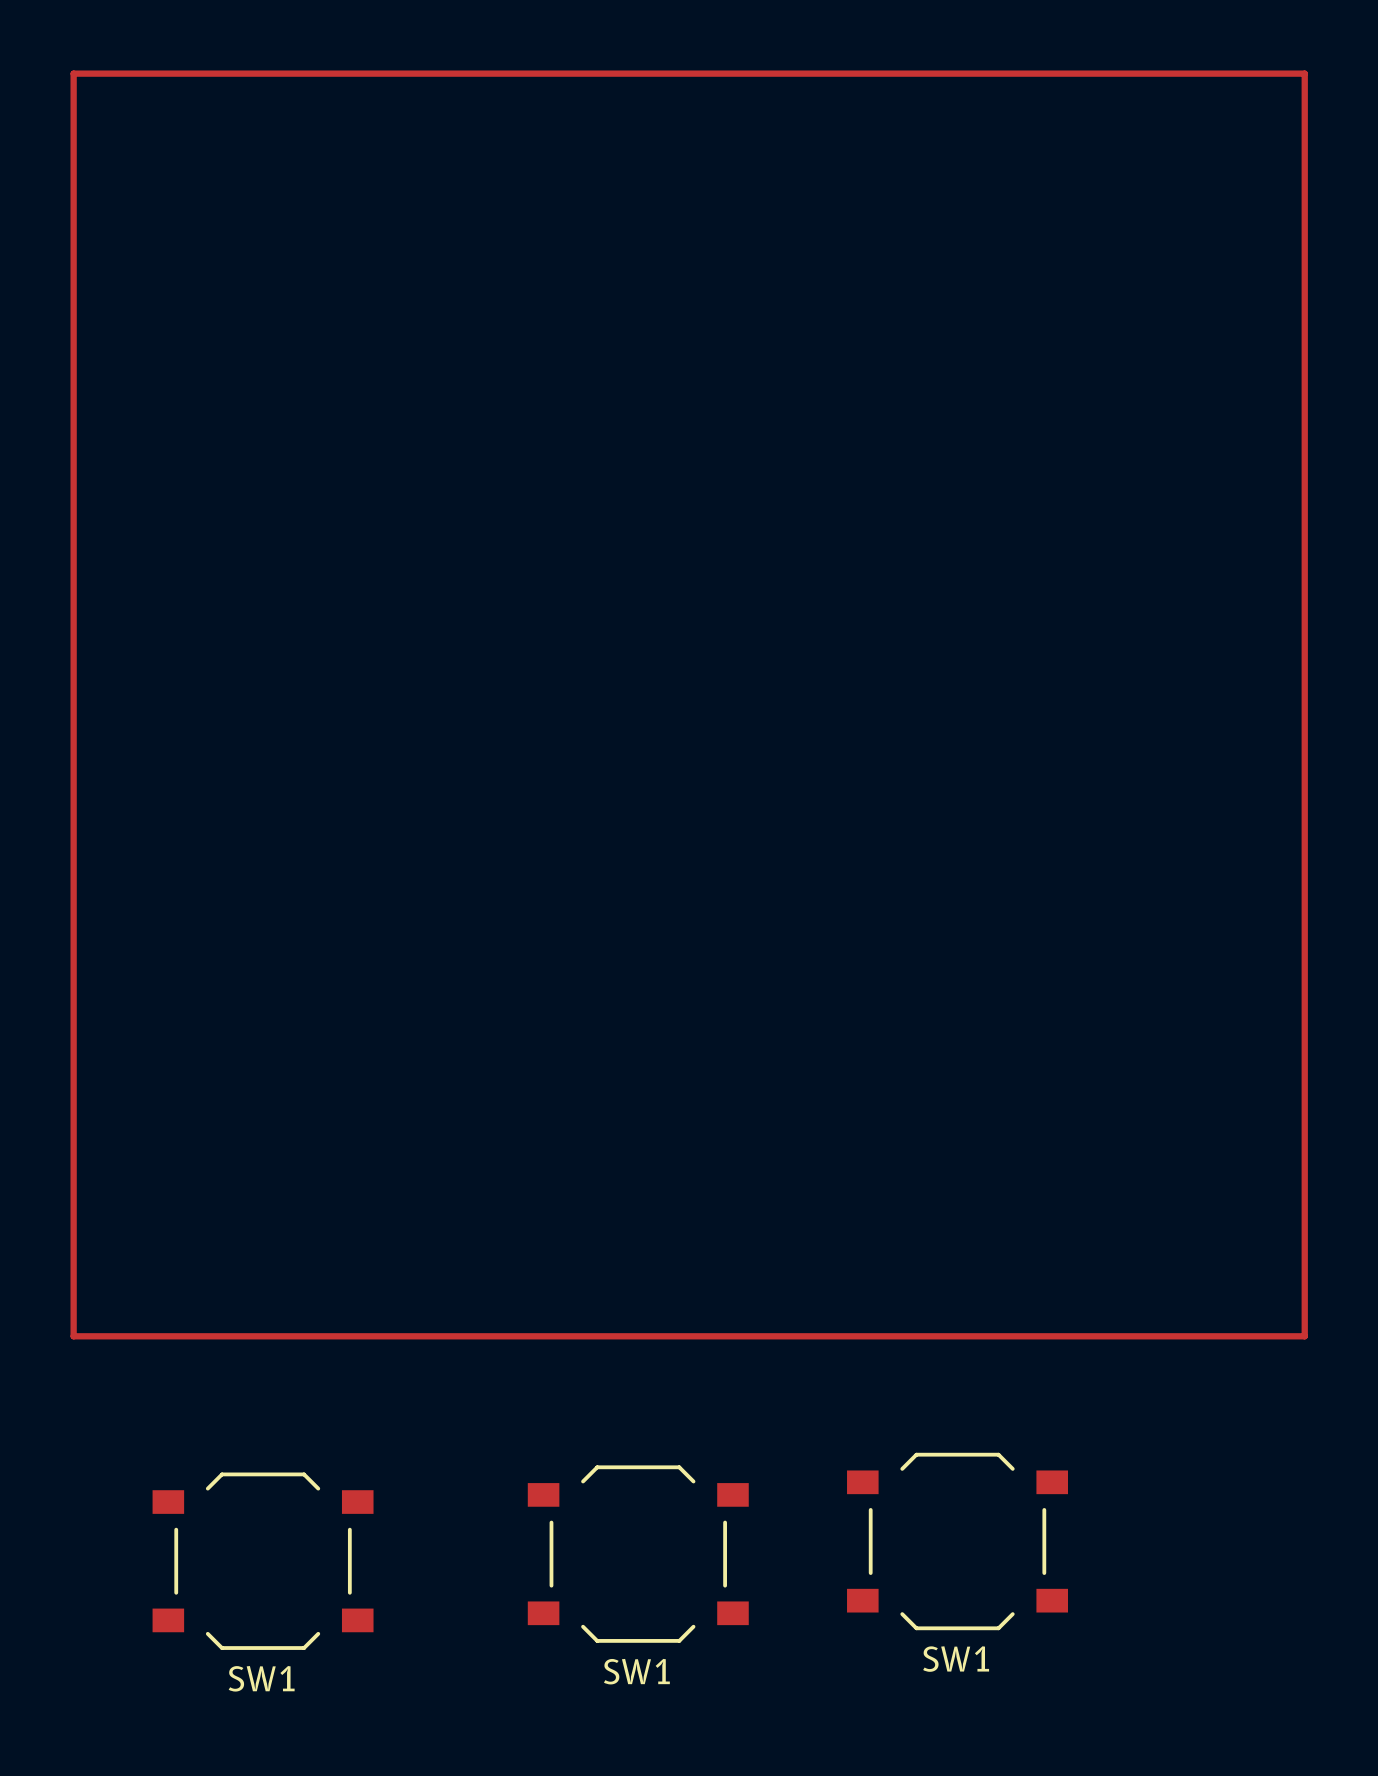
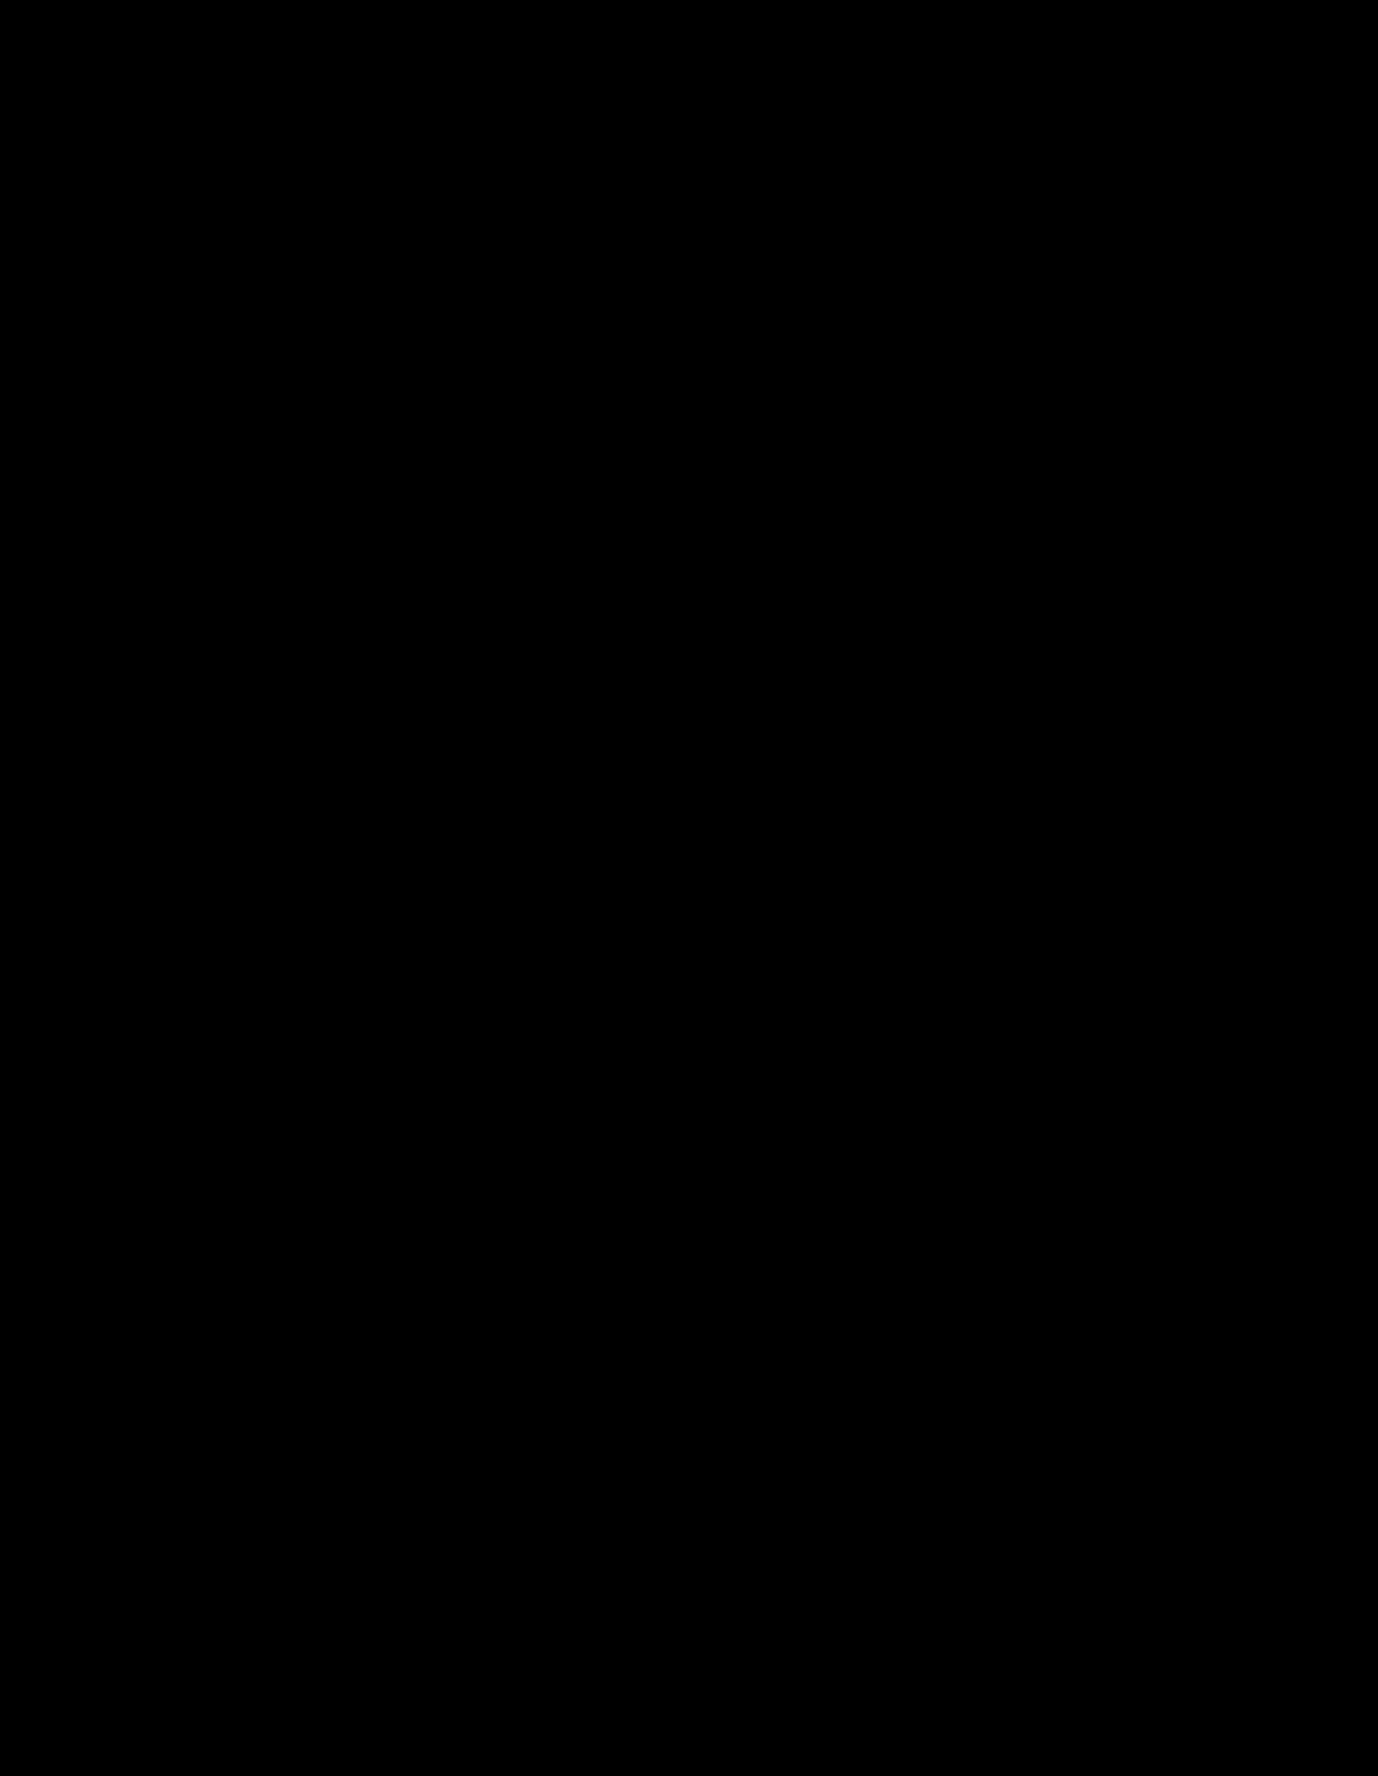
top track: (73, 73) (1304, 73) (1304, 1336) (73, 1336) (73, 73) -> none
SW1: (957, 1541) -> none
SW1: (638, 1554) -> none
SW1: (263, 1561) -> none

